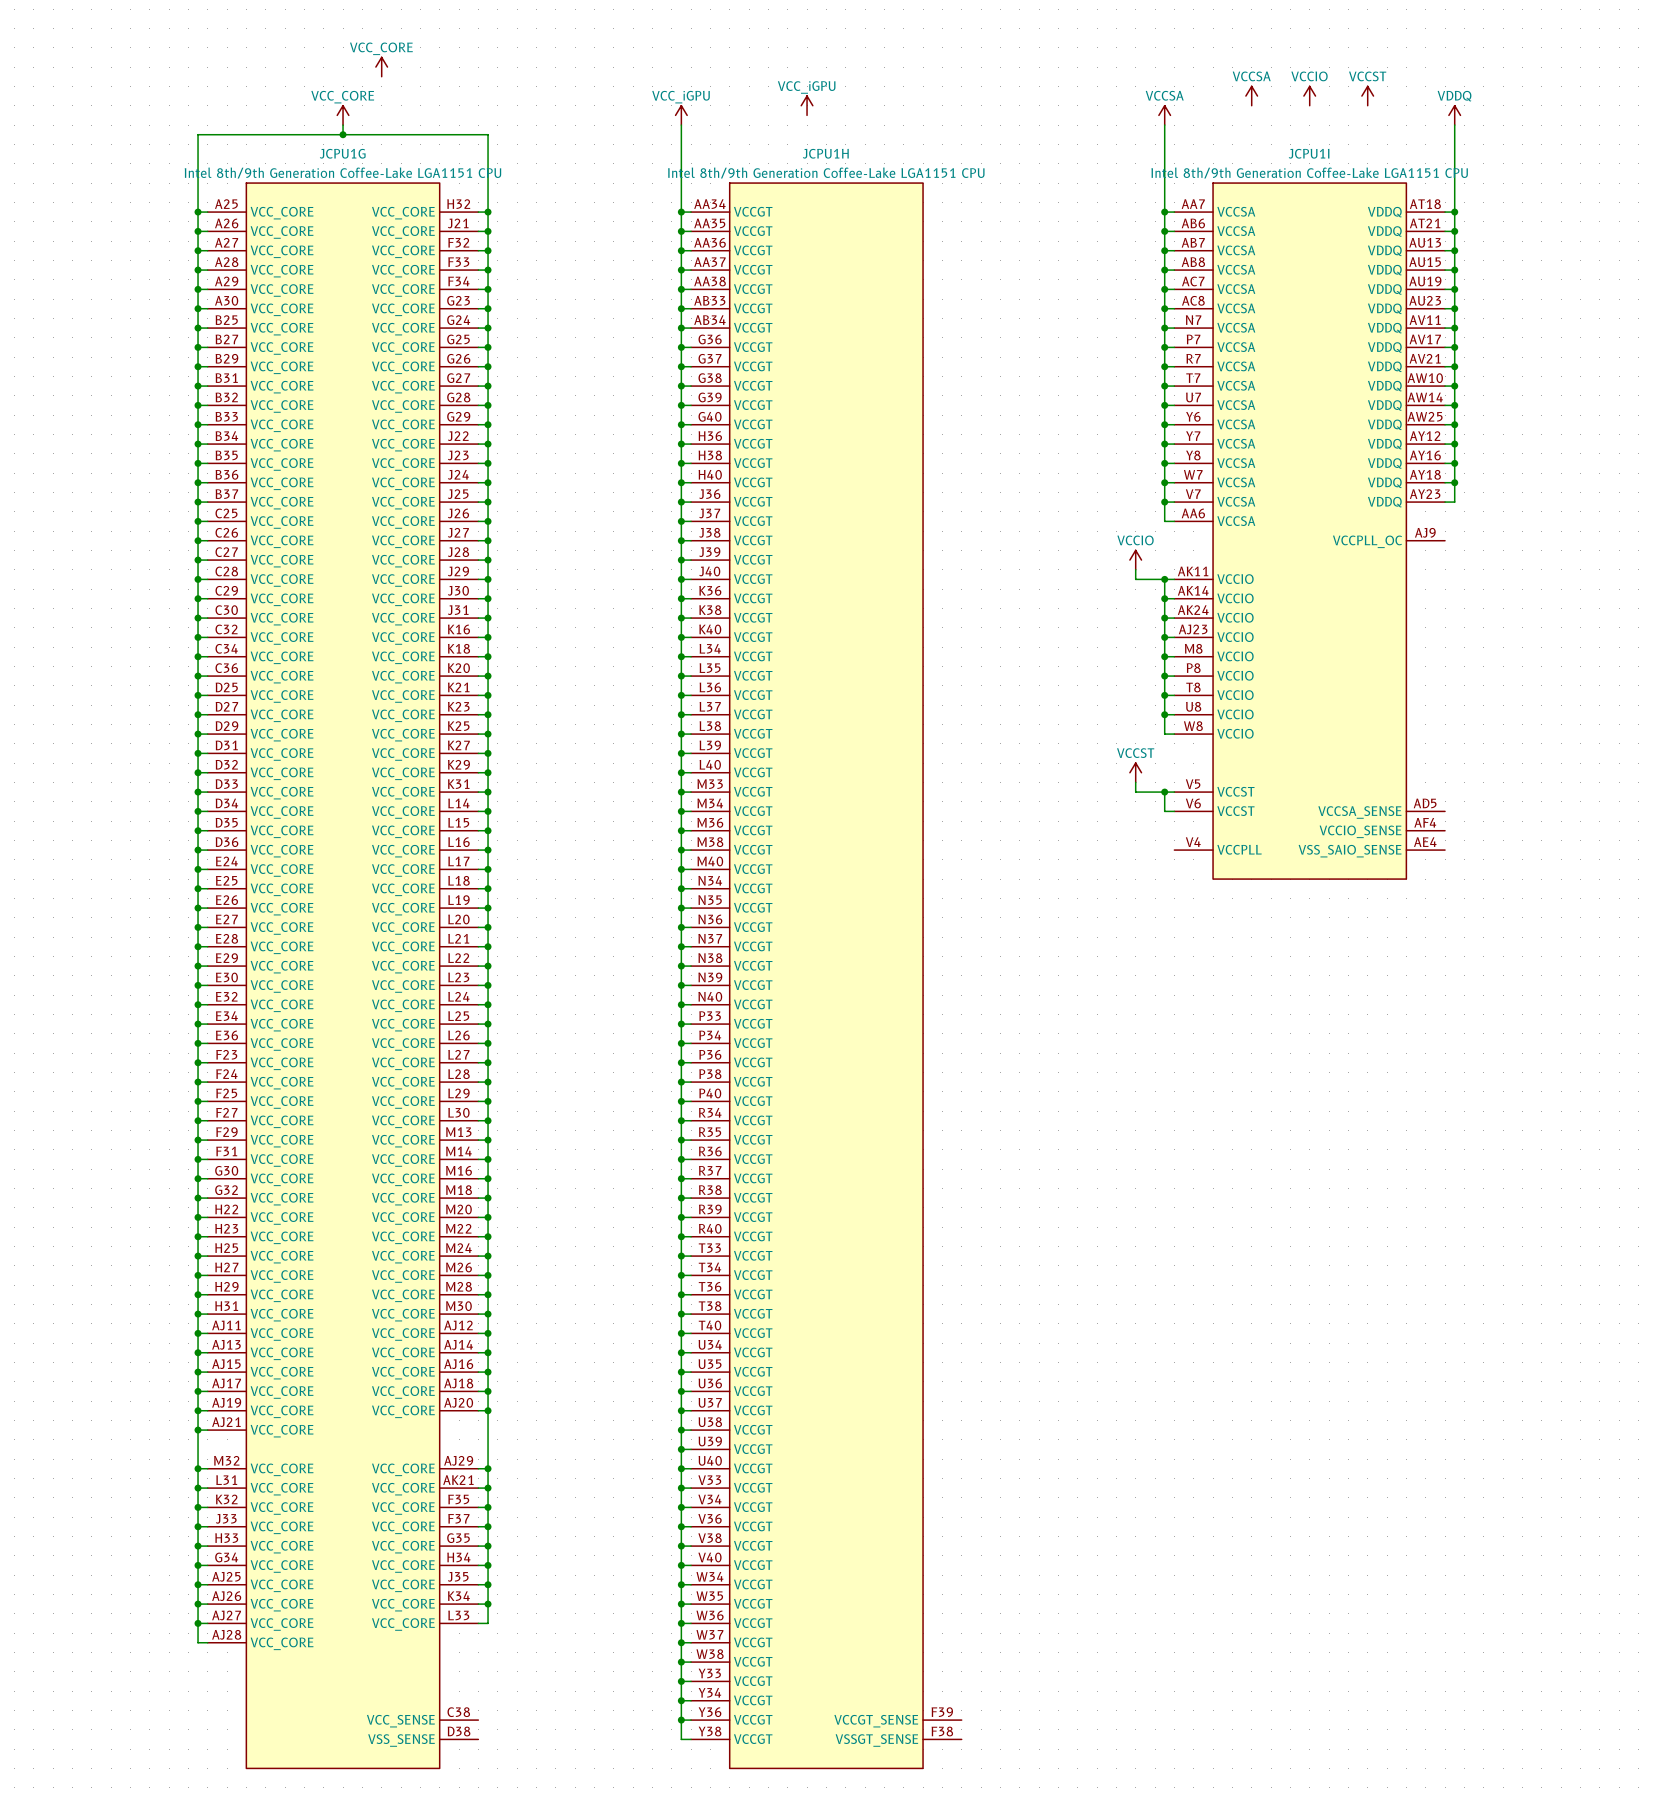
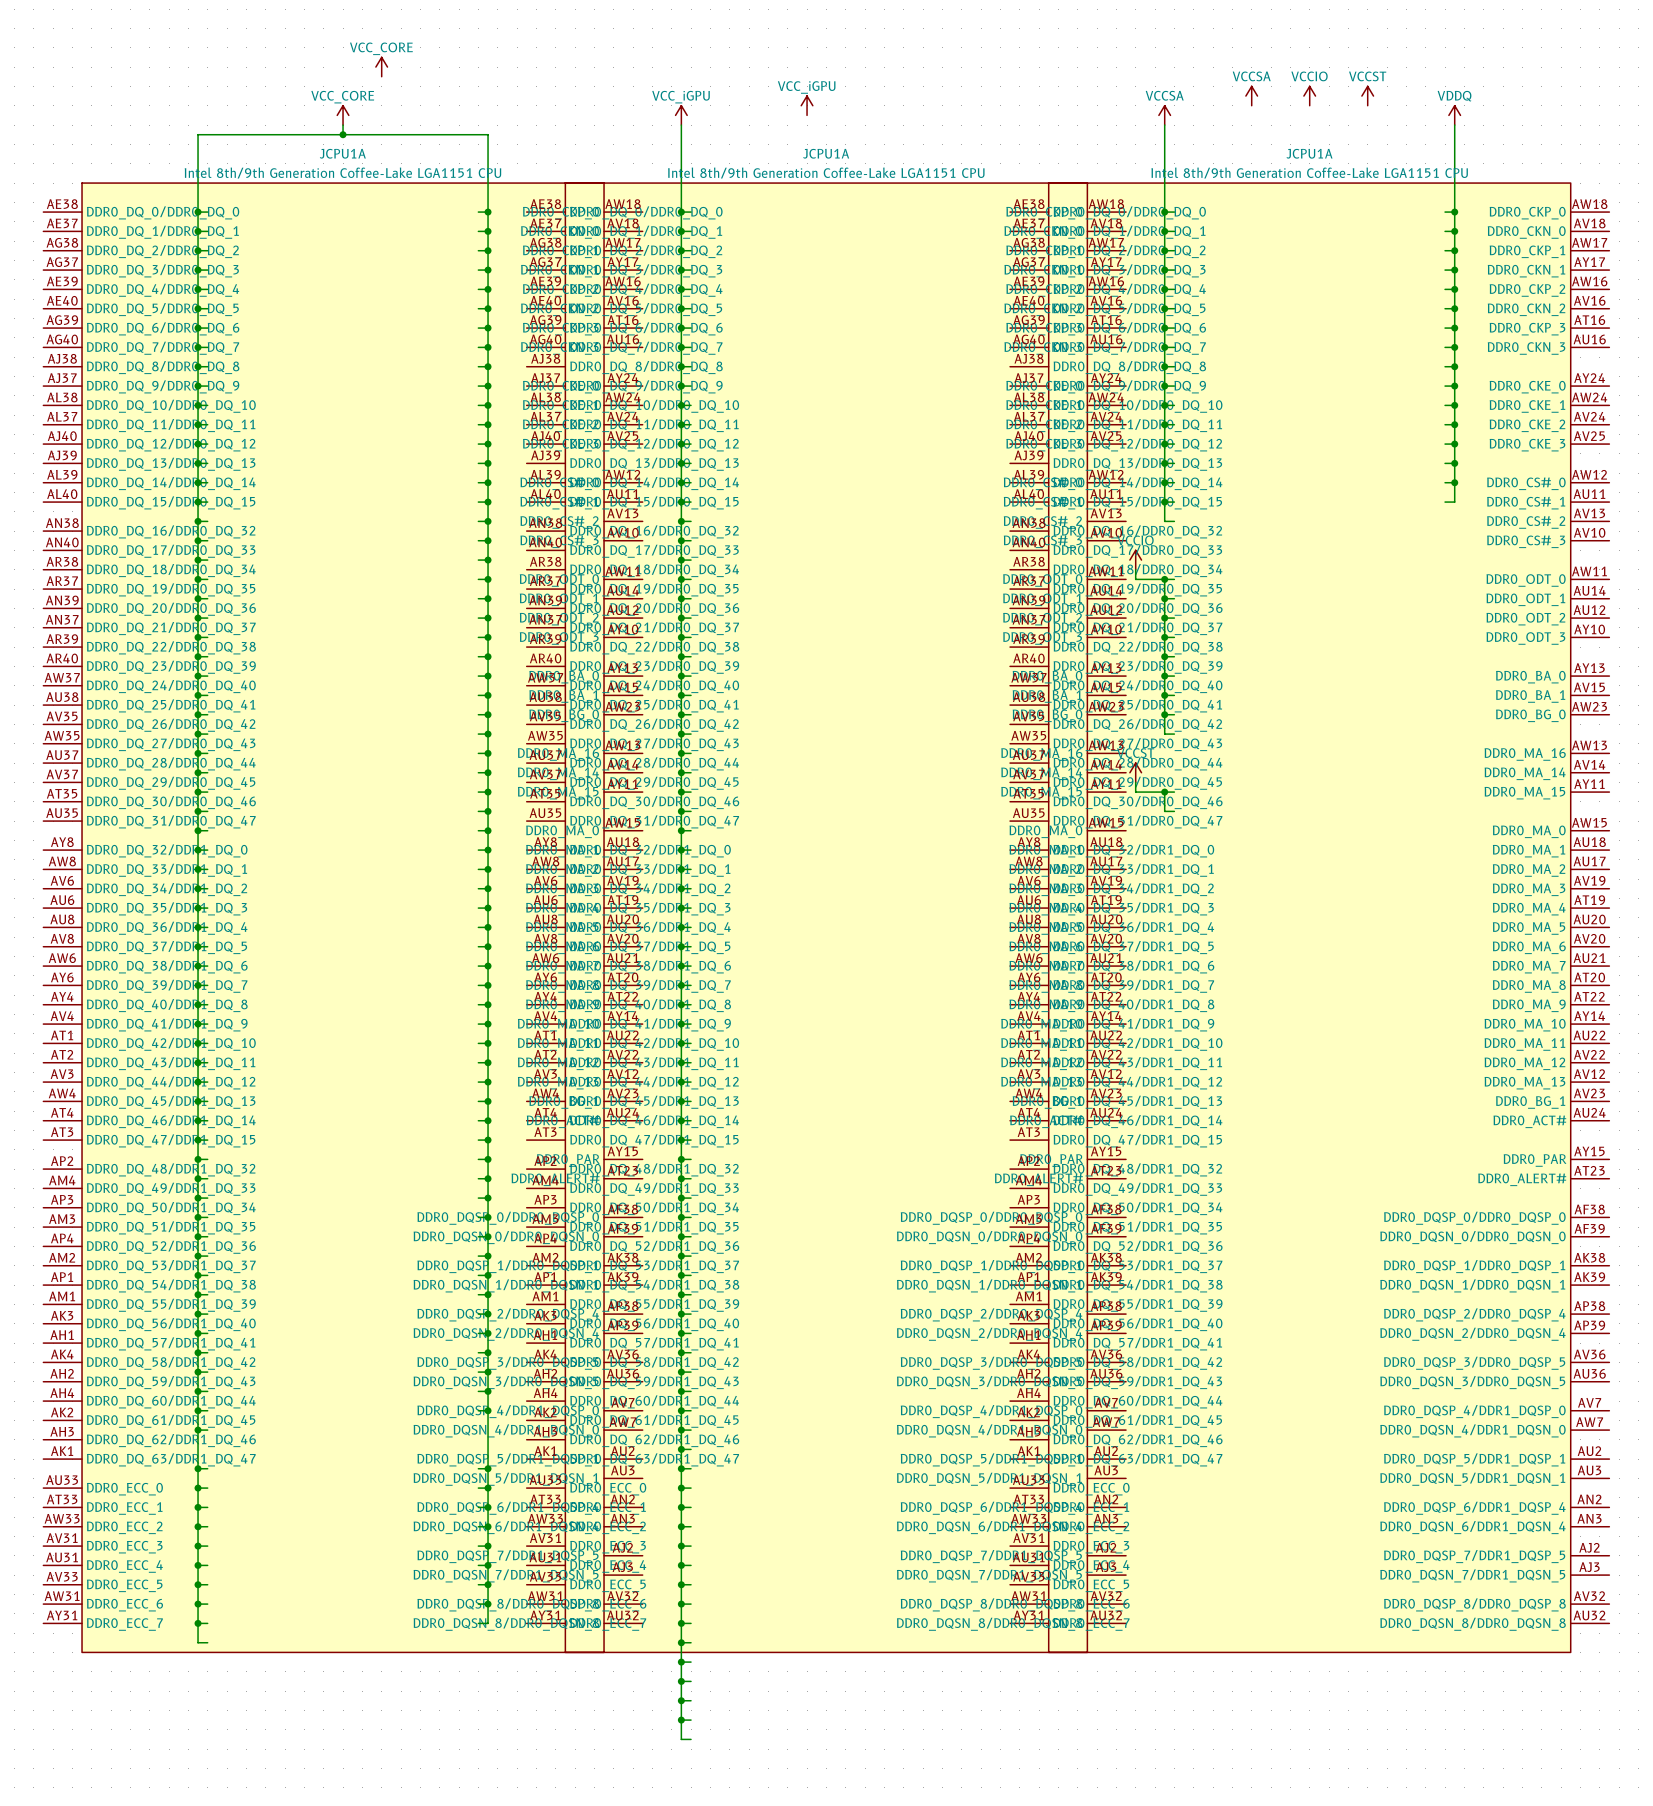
JCPU1I: Intel 8th/9th Generation Coffee-Lake LGA1151 CPU (1309, 531) -> none
JCPU1A: none -> Intel 8th/9th Generation Coffee-Lake LGA1151 CPU (343, 917)
JCPU1A: none -> Intel 8th/9th Generation Coffee-Lake LGA1151 CPU (826, 917)
JCPU1A: none -> Intel 8th/9th Generation Coffee-Lake LGA1151 CPU (1309, 917)
JCPU1G: Intel 8th/9th Generation Coffee-Lake LGA1151 CPU (343, 975) -> none
JCPU1H: Intel 8th/9th Generation Coffee-Lake LGA1151 CPU (826, 975) -> none

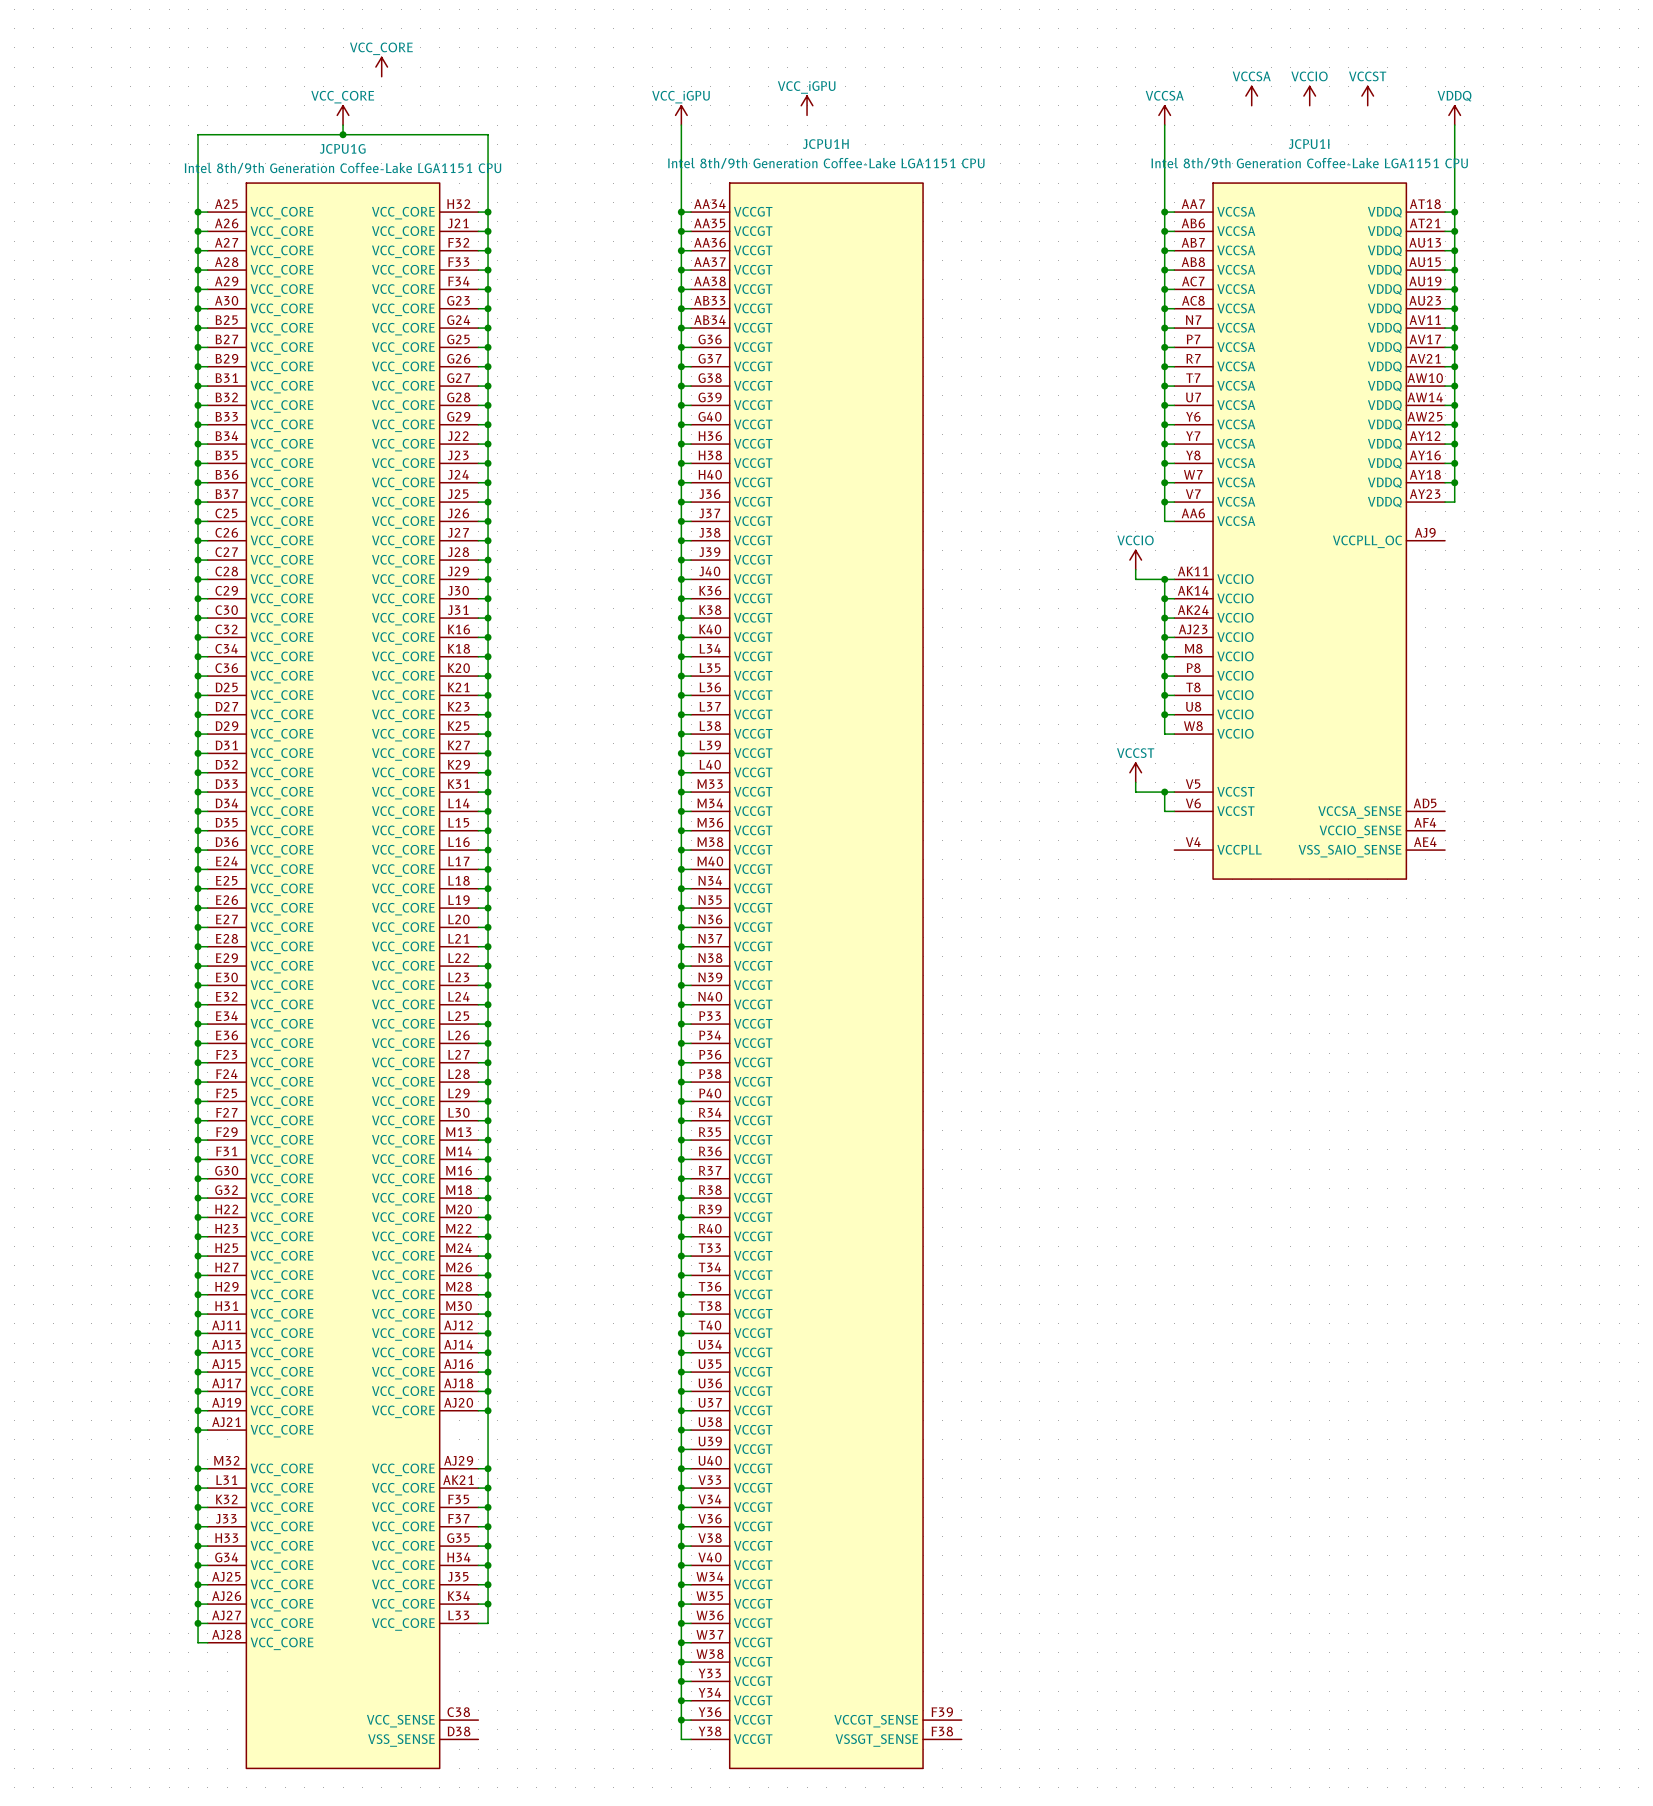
JCPU1I: none -> Intel 8th/9th Generation Coffee-Lake LGA1151 CPU (1309, 531)
JCPU1A: Intel 8th/9th Generation Coffee-Lake LGA1151 CPU (343, 917) -> none
JCPU1A: Intel 8th/9th Generation Coffee-Lake LGA1151 CPU (826, 917) -> none
JCPU1A: Intel 8th/9th Generation Coffee-Lake LGA1151 CPU (1309, 917) -> none
JCPU1G: none -> Intel 8th/9th Generation Coffee-Lake LGA1151 CPU (343, 975)
JCPU1H: none -> Intel 8th/9th Generation Coffee-Lake LGA1151 CPU (826, 975)

